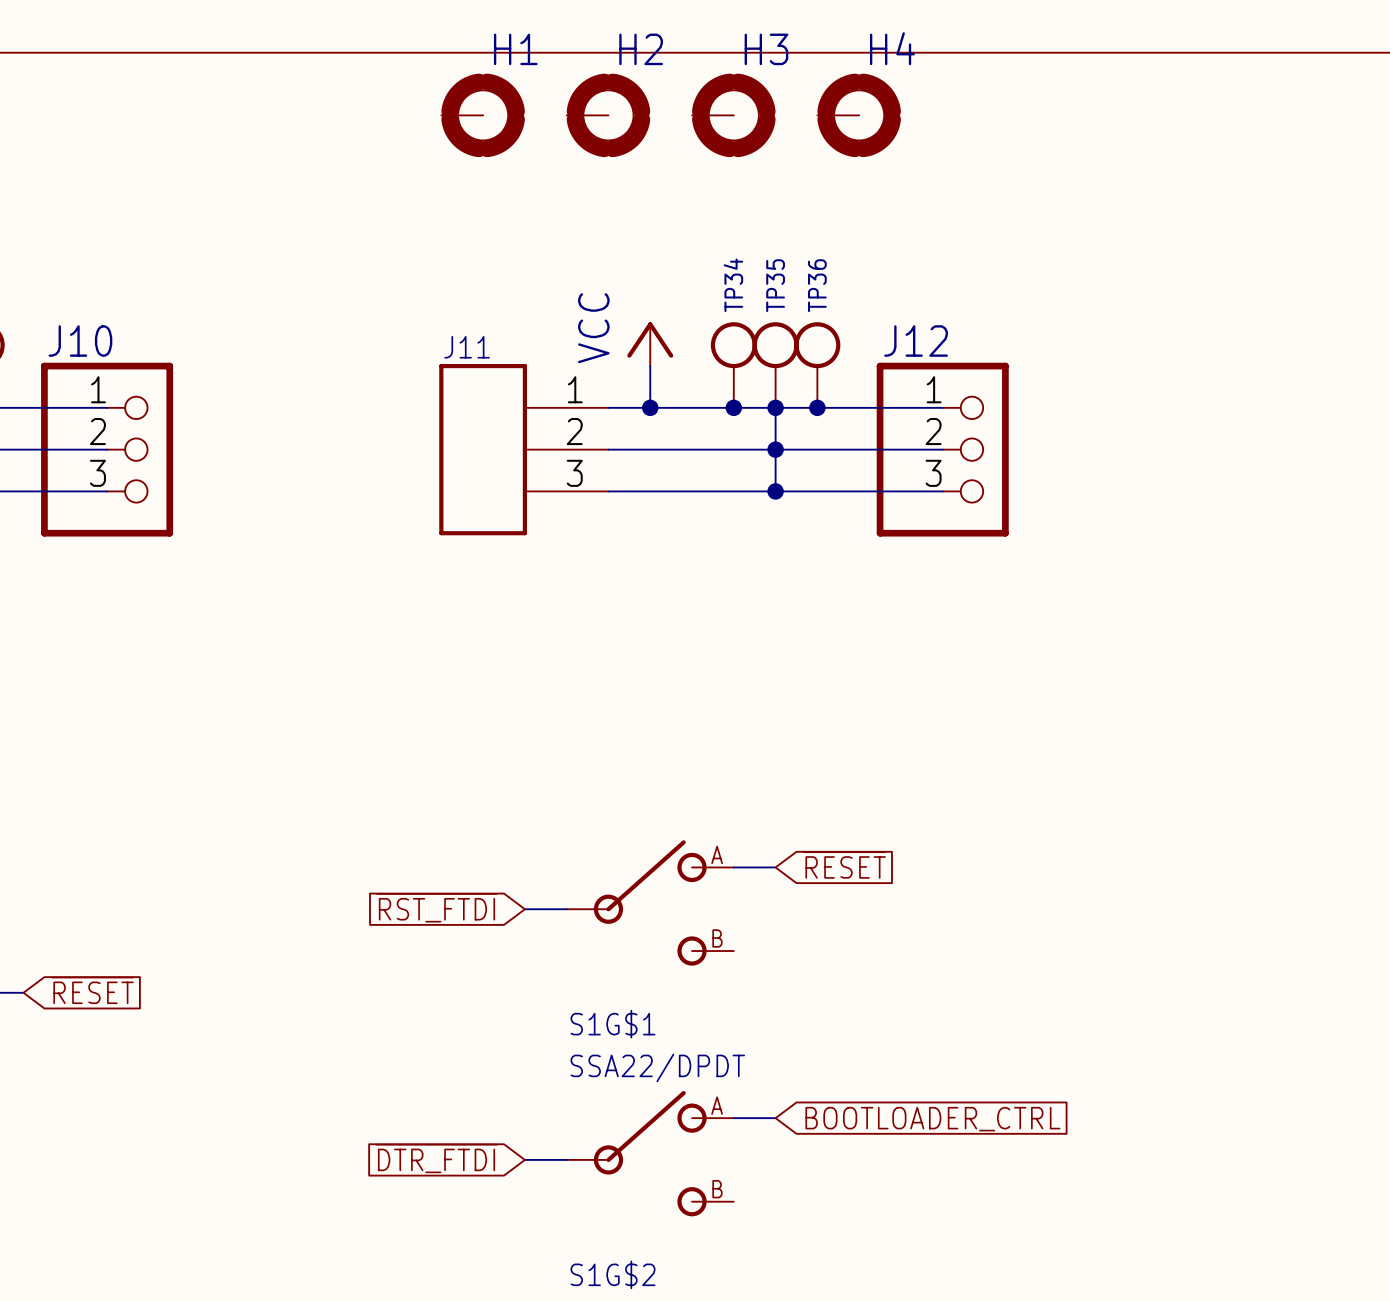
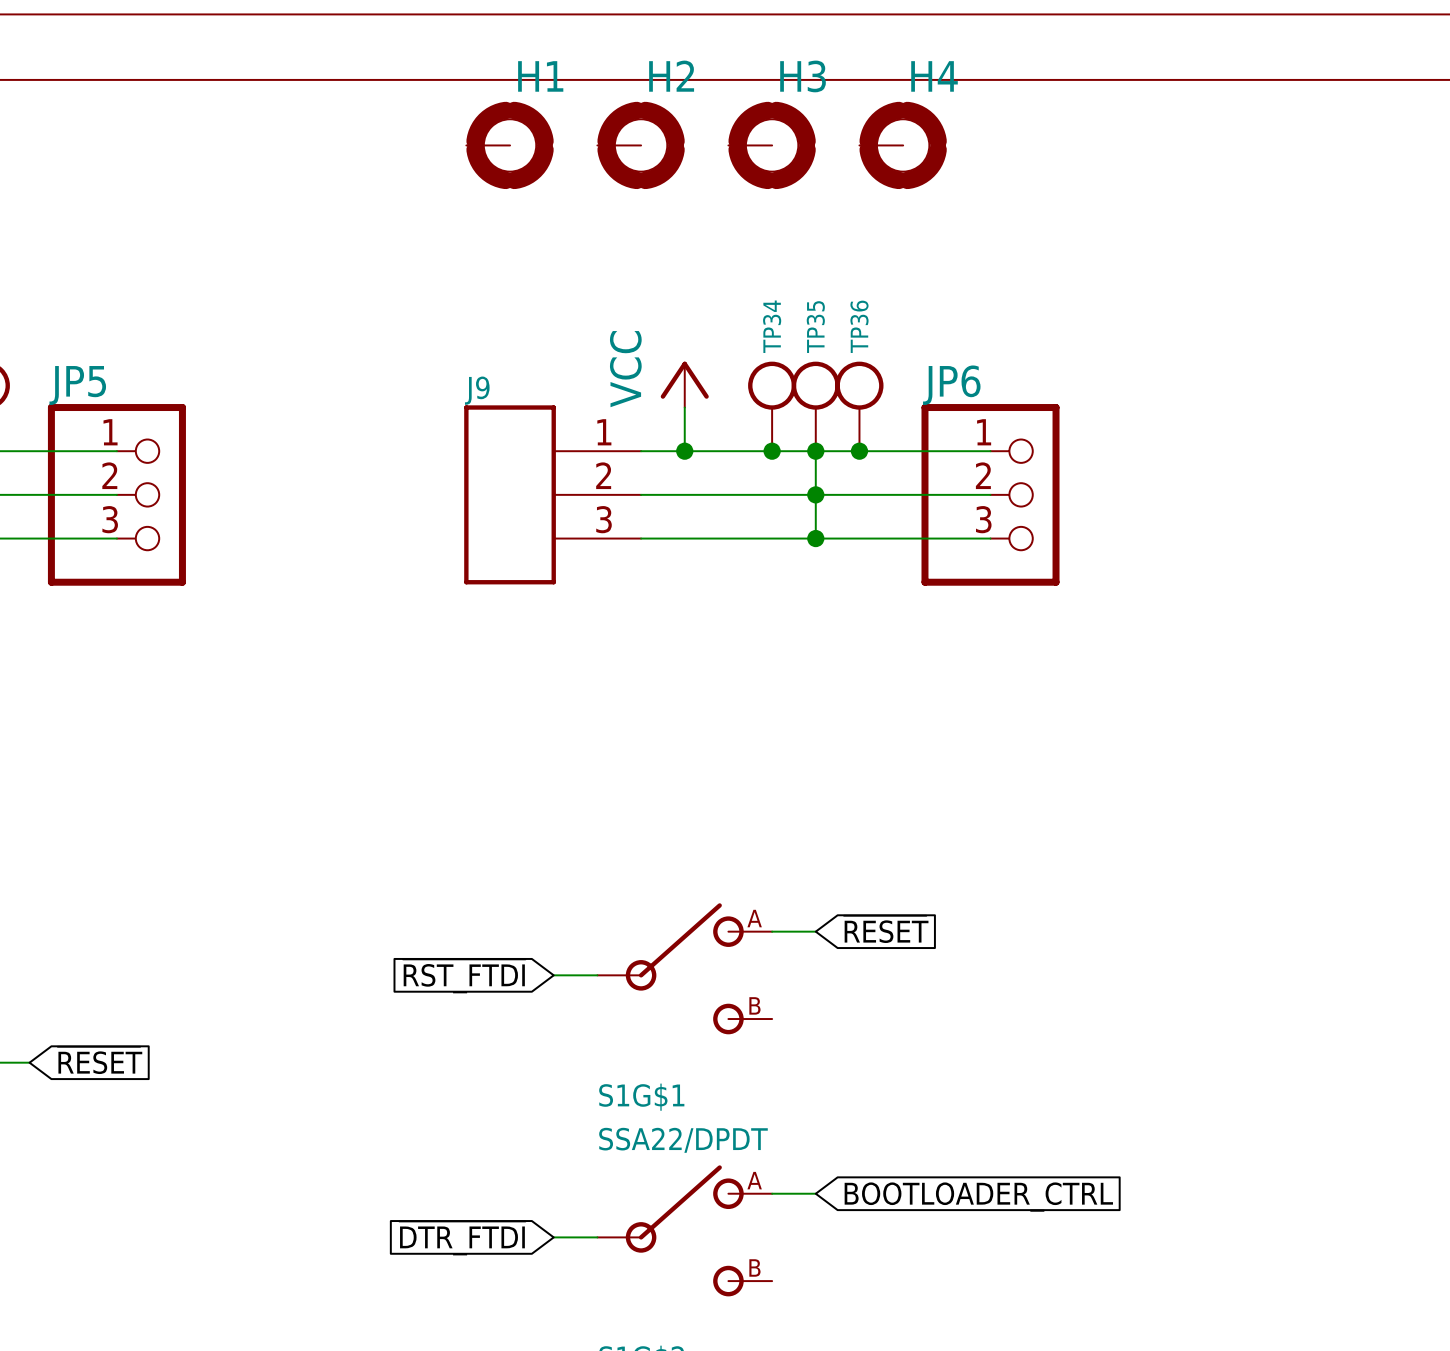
J10 name: J10 (80, 341) -> JP5 (77, 385)
J12 name: J12 (916, 341) -> JP6 (951, 385)
J11 name: J11 (467, 347) -> J9 (477, 390)

